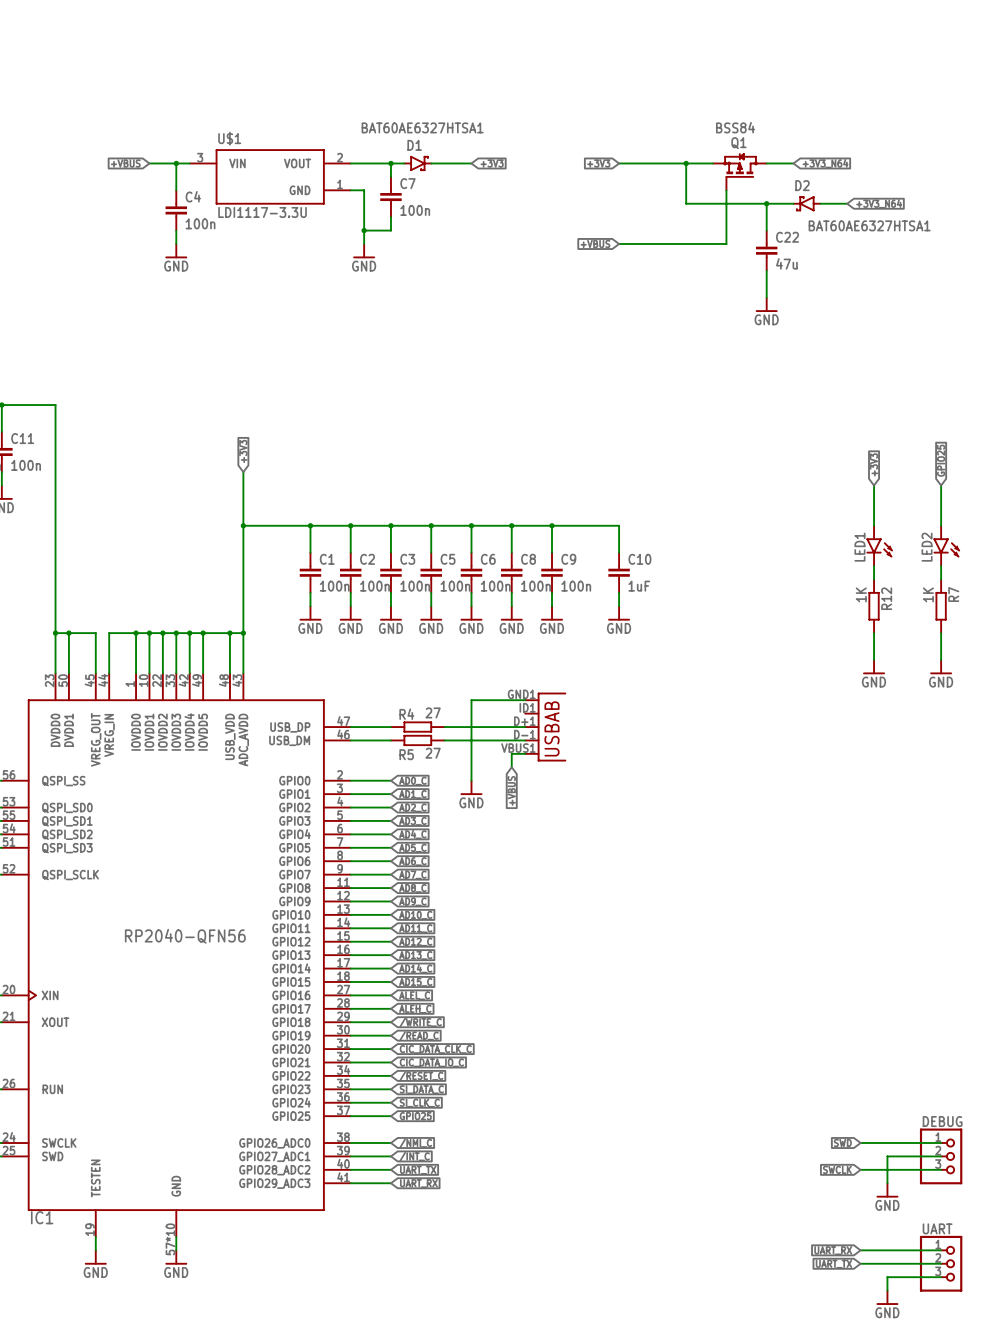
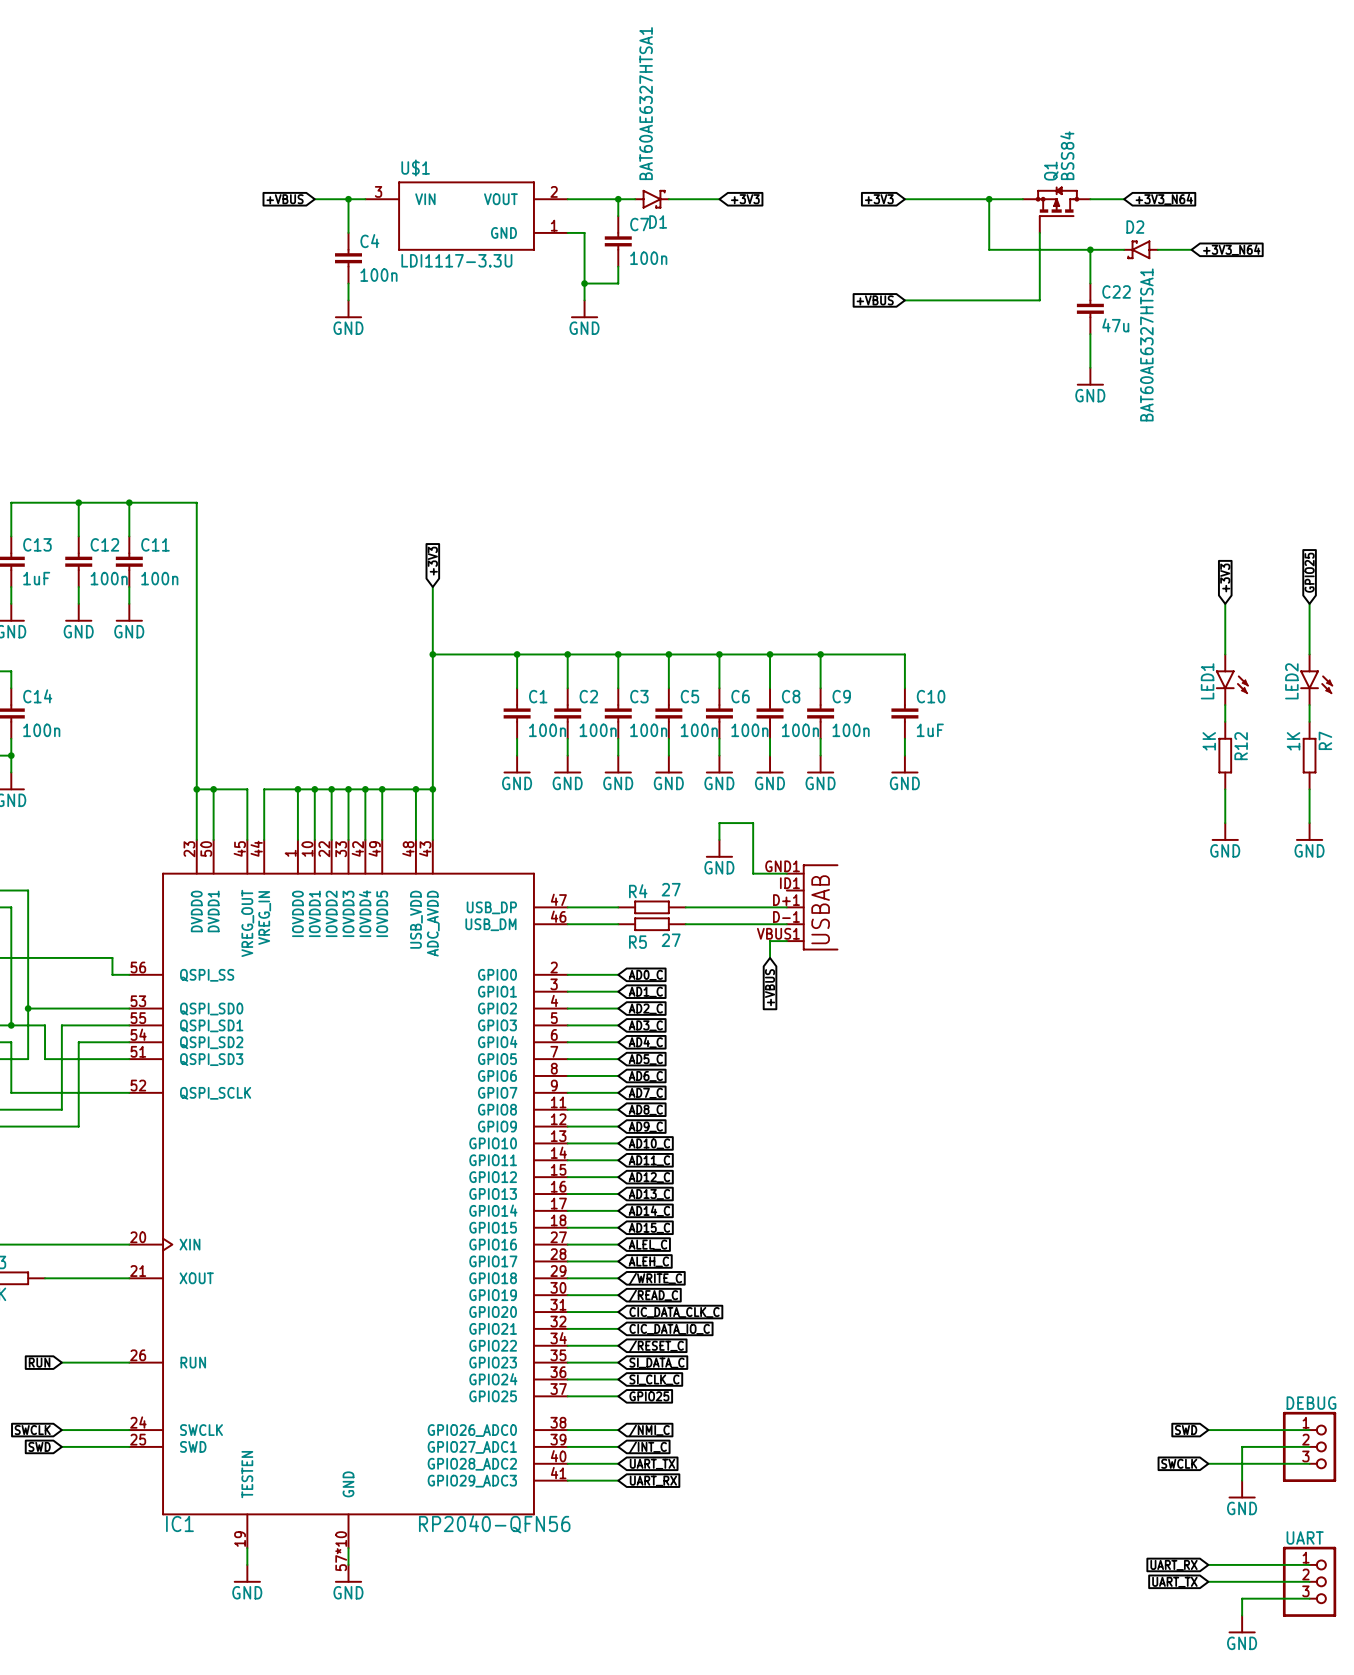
D1 value rotation: 0° (422, 127) -> 90° counterclockwise (646, 103)
Q1 value rotation: 0° (735, 127) -> 90° counterclockwise (1067, 155)
Q1 name rotation: 0° (738, 143) -> 90° counterclockwise (1051, 171)
D1 name position: D1 (414, 145) -> D1 (658, 221)
D2 value rotation: 0° (869, 225) -> 90° counterclockwise (1146, 344)
wire: (498, 700) (471, 700) (471, 780) -> (753, 873) (753, 823) (719, 823) (719, 839)
power symbol position: GND (471, 787) -> GND (719, 848)
IC1 value position: RP2040-QFN56 (185, 936) -> RP2040-QFN56 (494, 1524)

